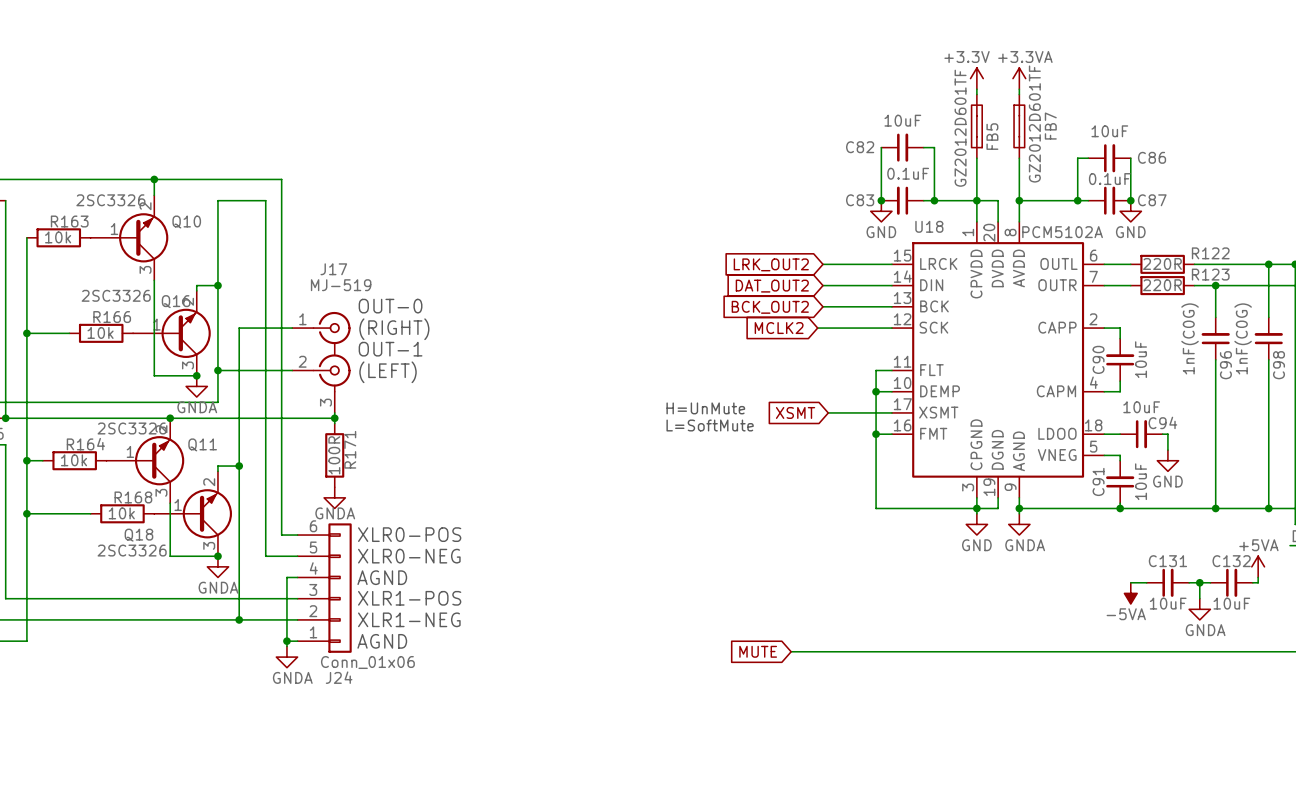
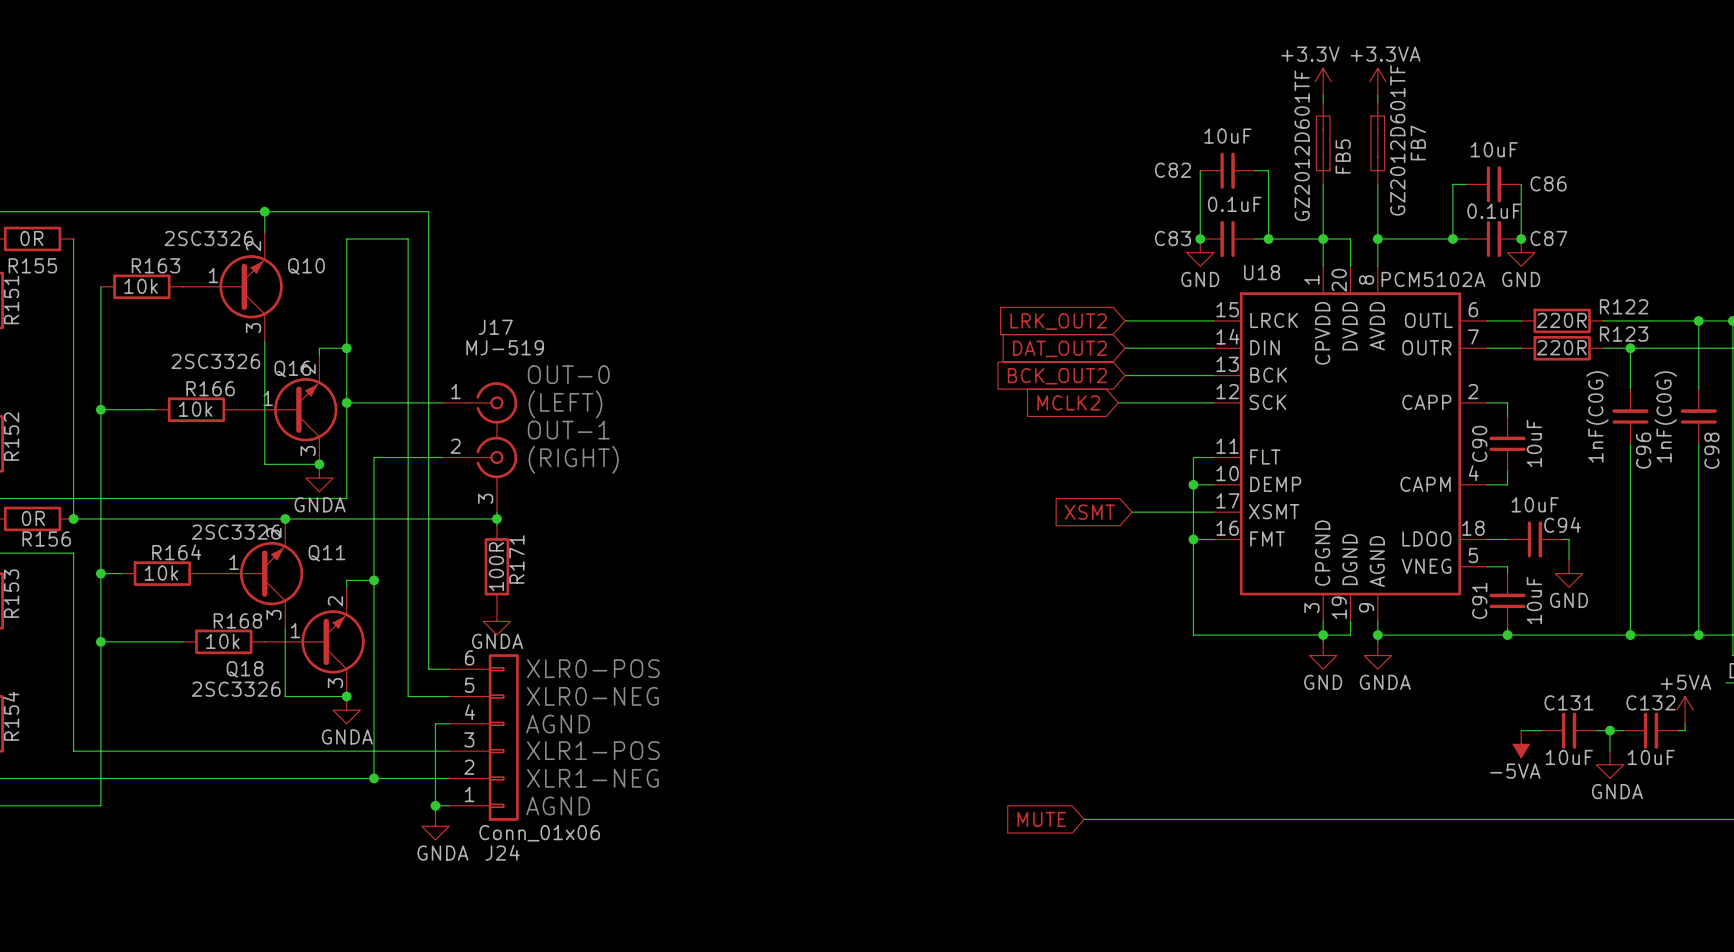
wire: (239, 328) (239, 370) (217, 370) -> (374, 402) (346, 402)
text: (RIGHT) (394, 329) -> (LEFT) (565, 404)
junction position: (217, 370) -> (346, 402)
text: (LEFT) (388, 372) -> (RIGHT) (573, 459)
text: H=UnMute (705, 408) -> none
text: L=SoftMute (710, 425) -> none

